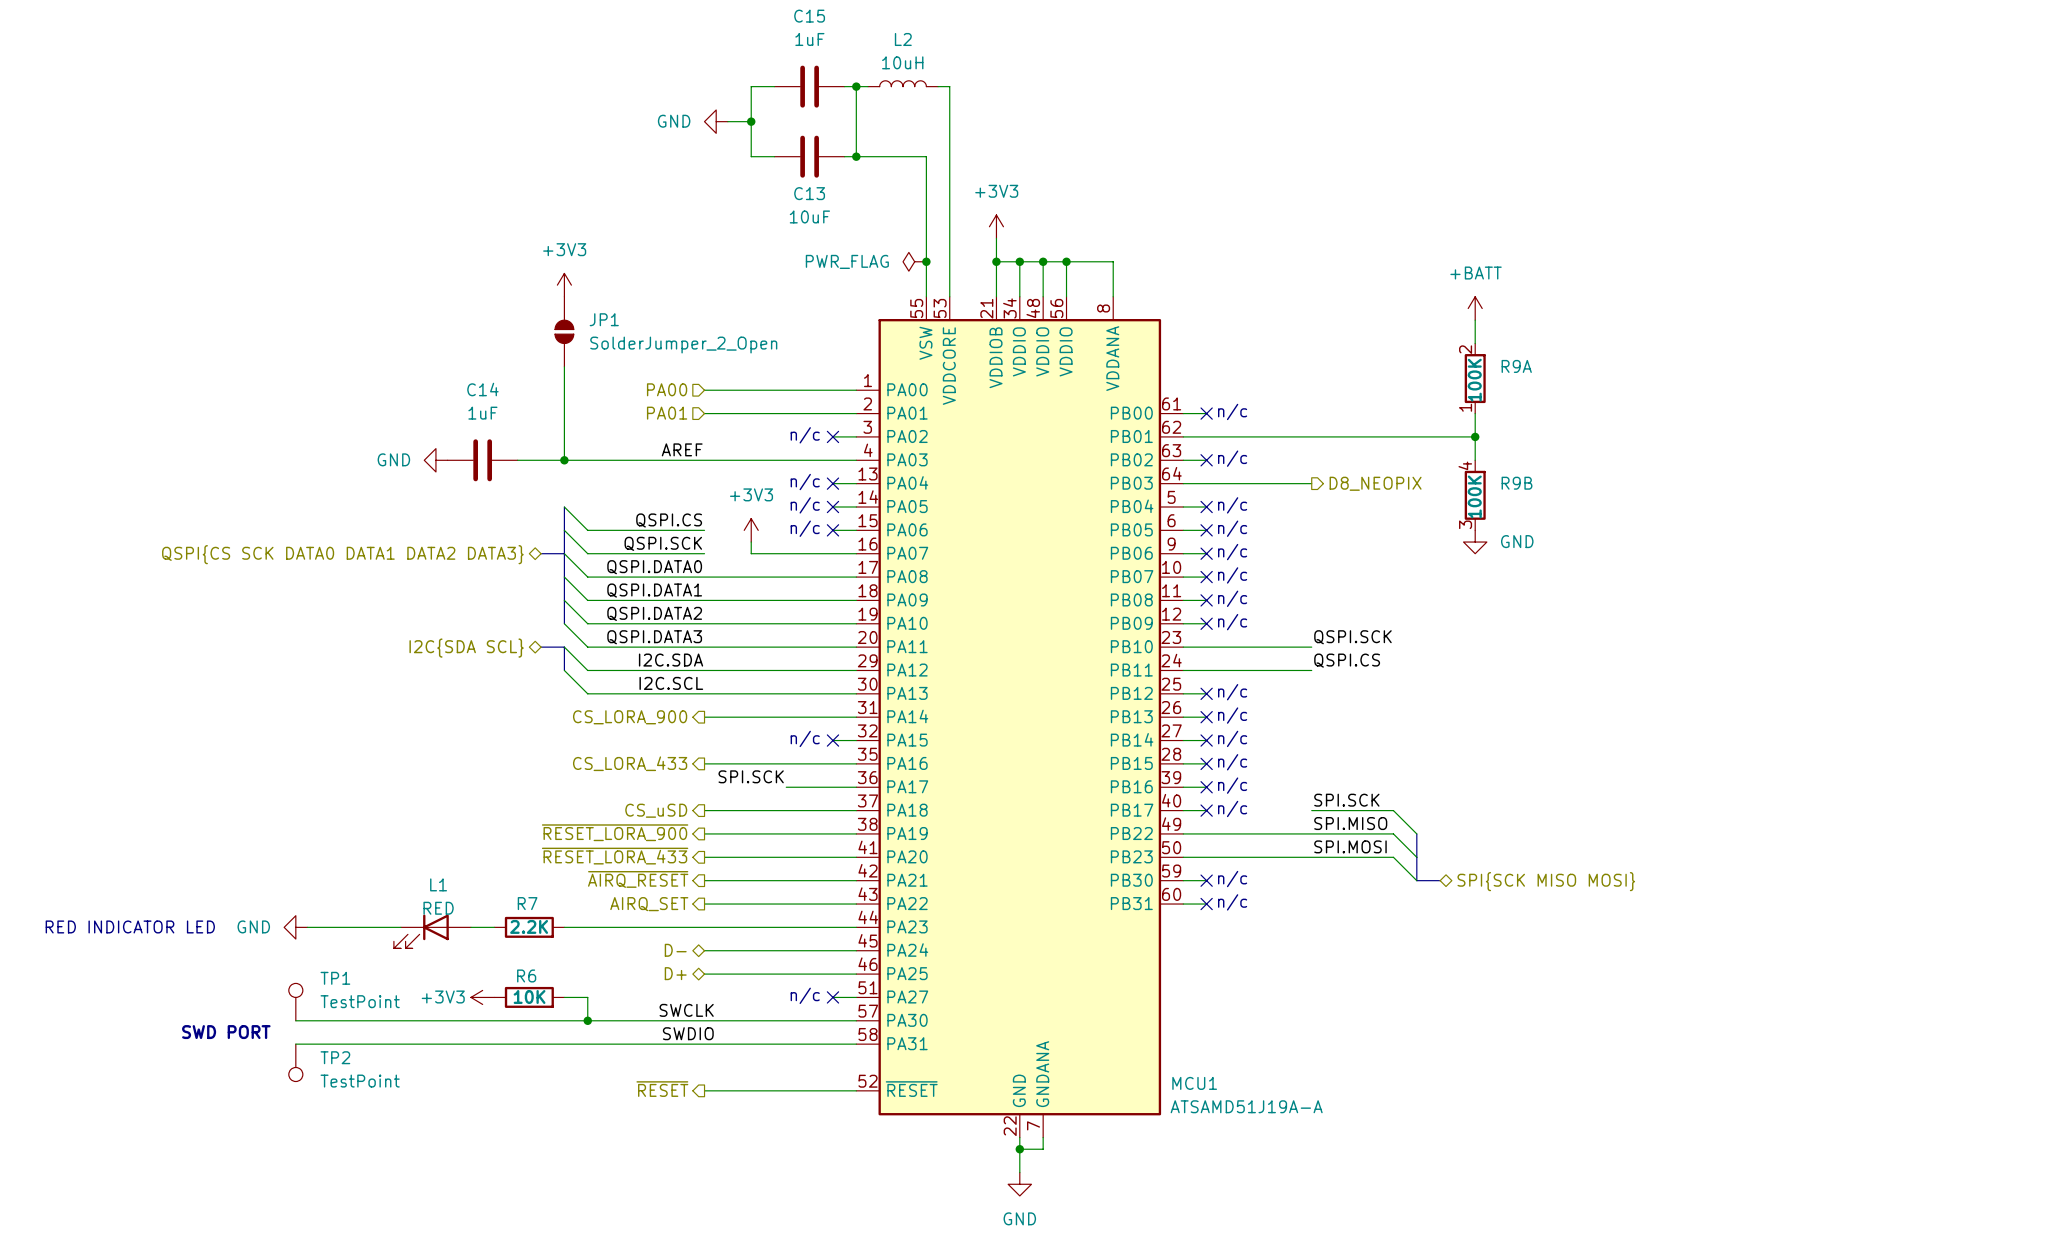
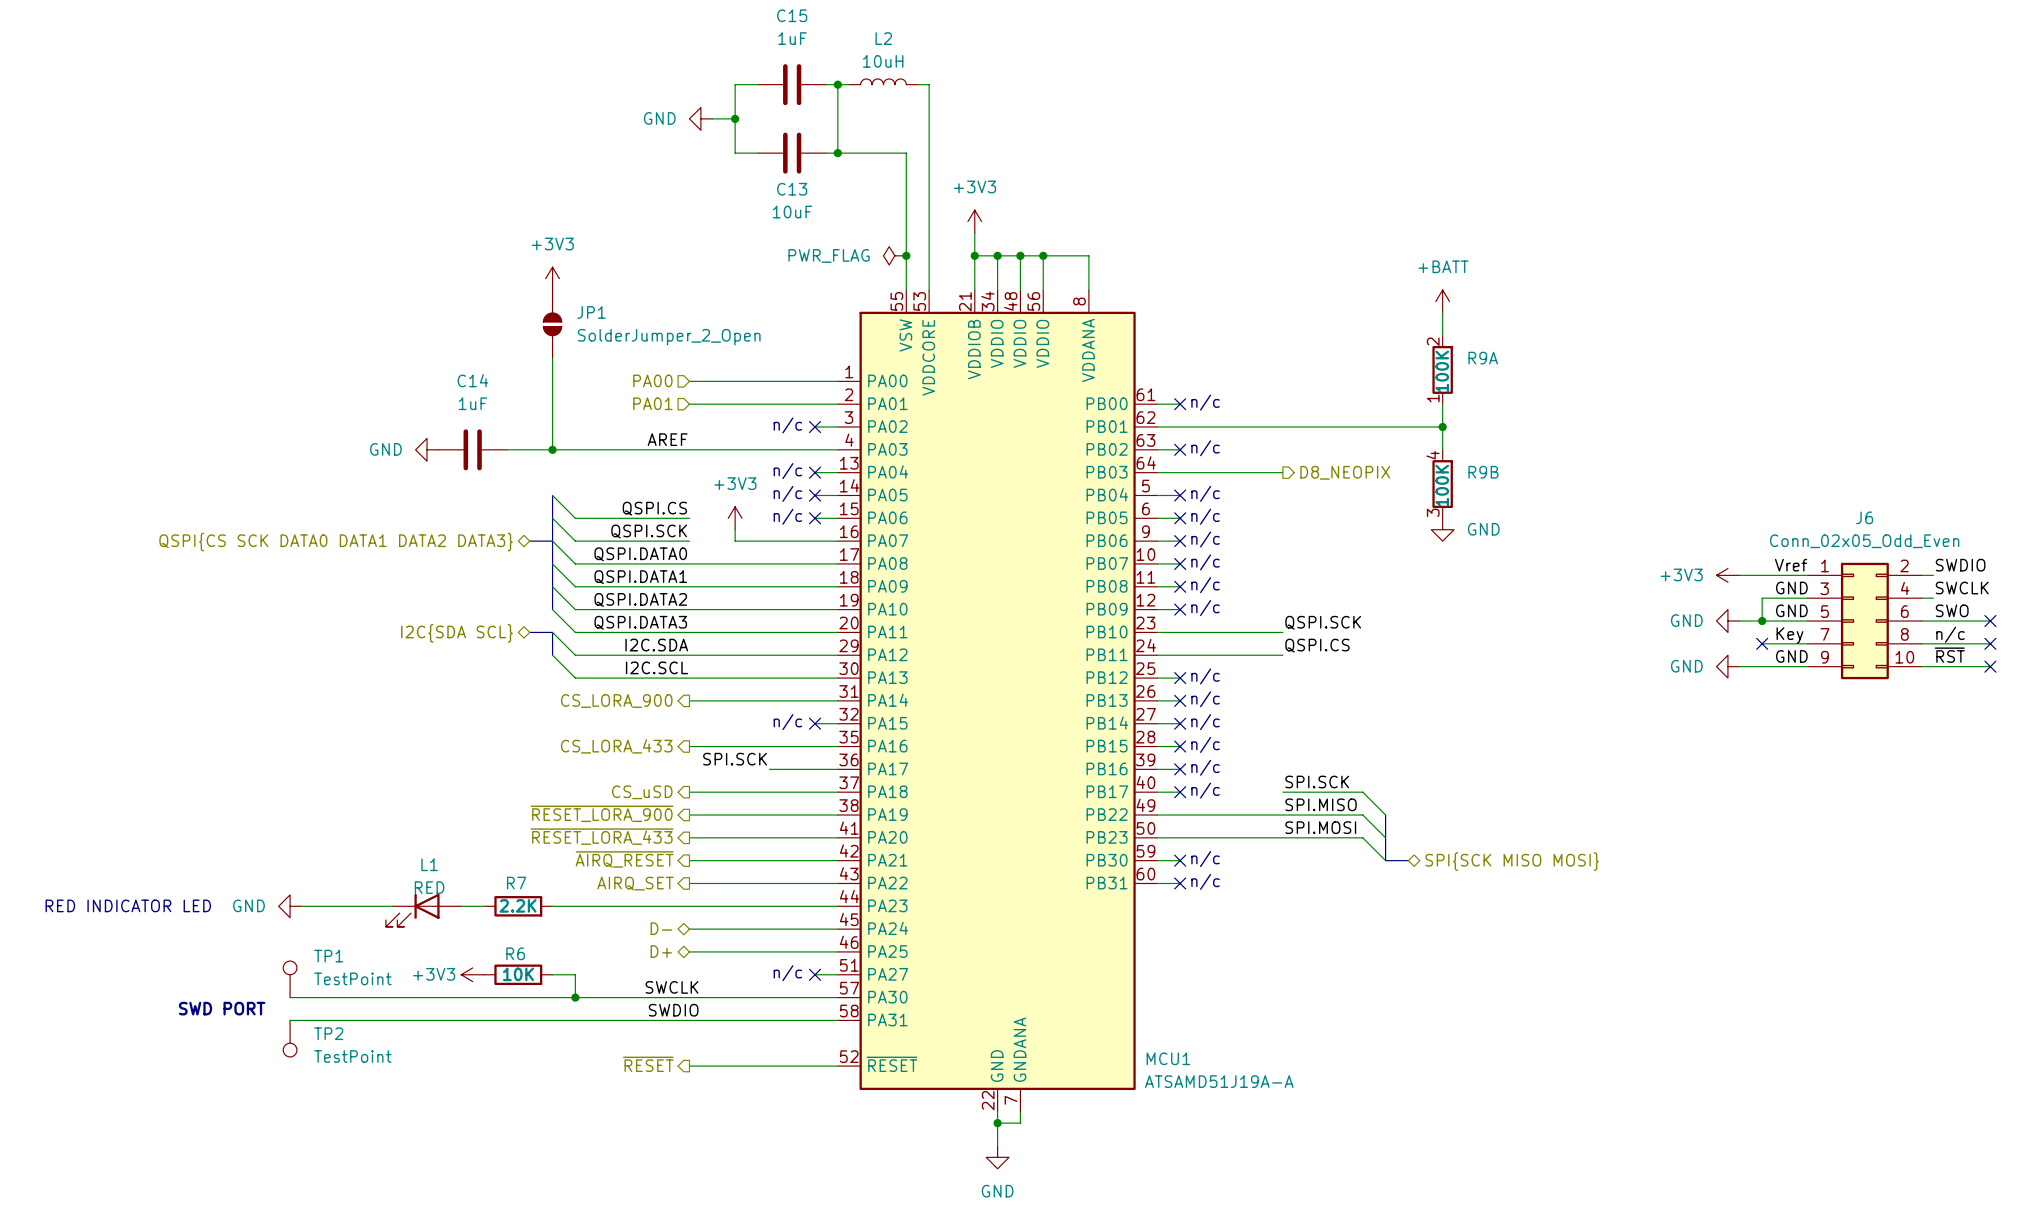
label: none -> Vref (1791, 565)
label: none -> SWDIO (1960, 565)
power symbol: none -> +3V3 (1727, 575)
wire: none -> (1739, 575) (1807, 575)
wire: none -> (1921, 575) (1933, 575)
label: none -> GND (1791, 588)
label: none -> SWCLK (1962, 588)
wire: none -> (1807, 598) (1762, 598) (1762, 621)
wire: none -> (1921, 598) (1933, 598)
label: none -> GND (1791, 610)
label: none -> SWO (1952, 610)
power symbol: none -> GND (1727, 621)
wire: none -> (1739, 621) (1807, 621)
junction: none -> (1762, 621)
J6: none -> Conn_02x05_Odd_Even (1864, 621)
wire: none -> (1921, 621) (1990, 621)
no-connect mark: none -> (1990, 621)
label: none -> n/c (1950, 634)
label: none -> Key (1789, 635)
wire: none -> (1762, 643) (1807, 643)
no-connect mark: none -> (1762, 643)
wire: none -> (1921, 643) (1990, 643)
no-connect mark: none -> (1990, 643)
label: none -> ~{RST} (1949, 655)
label: none -> GND (1791, 656)
power symbol: none -> GND (1727, 666)
wire: none -> (1739, 666) (1807, 666)
wire: none -> (1921, 666) (1990, 666)
no-connect mark: none -> (1990, 666)

